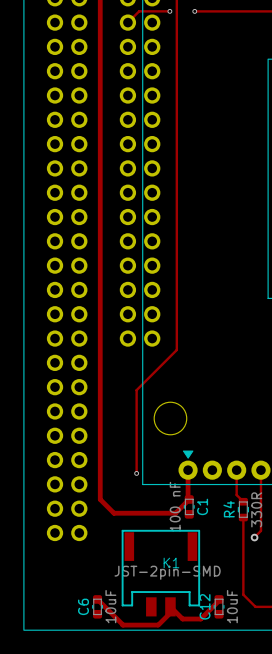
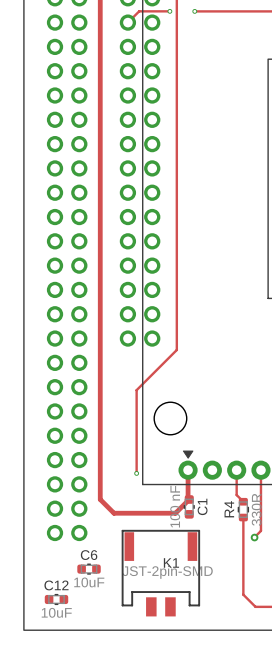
track: (97, 599) (123, 625) -> none
track: (219, 599) (200, 619) (182, 619) (170, 606) (170, 612) (158, 625) -> none
C6 rotation: 0° (97, 606) -> 90° clockwise (89, 569)
C6 position: (97, 606) -> (89, 569)
C12 rotation: 0° (219, 606) -> 90° clockwise (56, 599)
C12 position: (219, 606) -> (56, 599)
track: (122, 625) (157, 625) -> none

